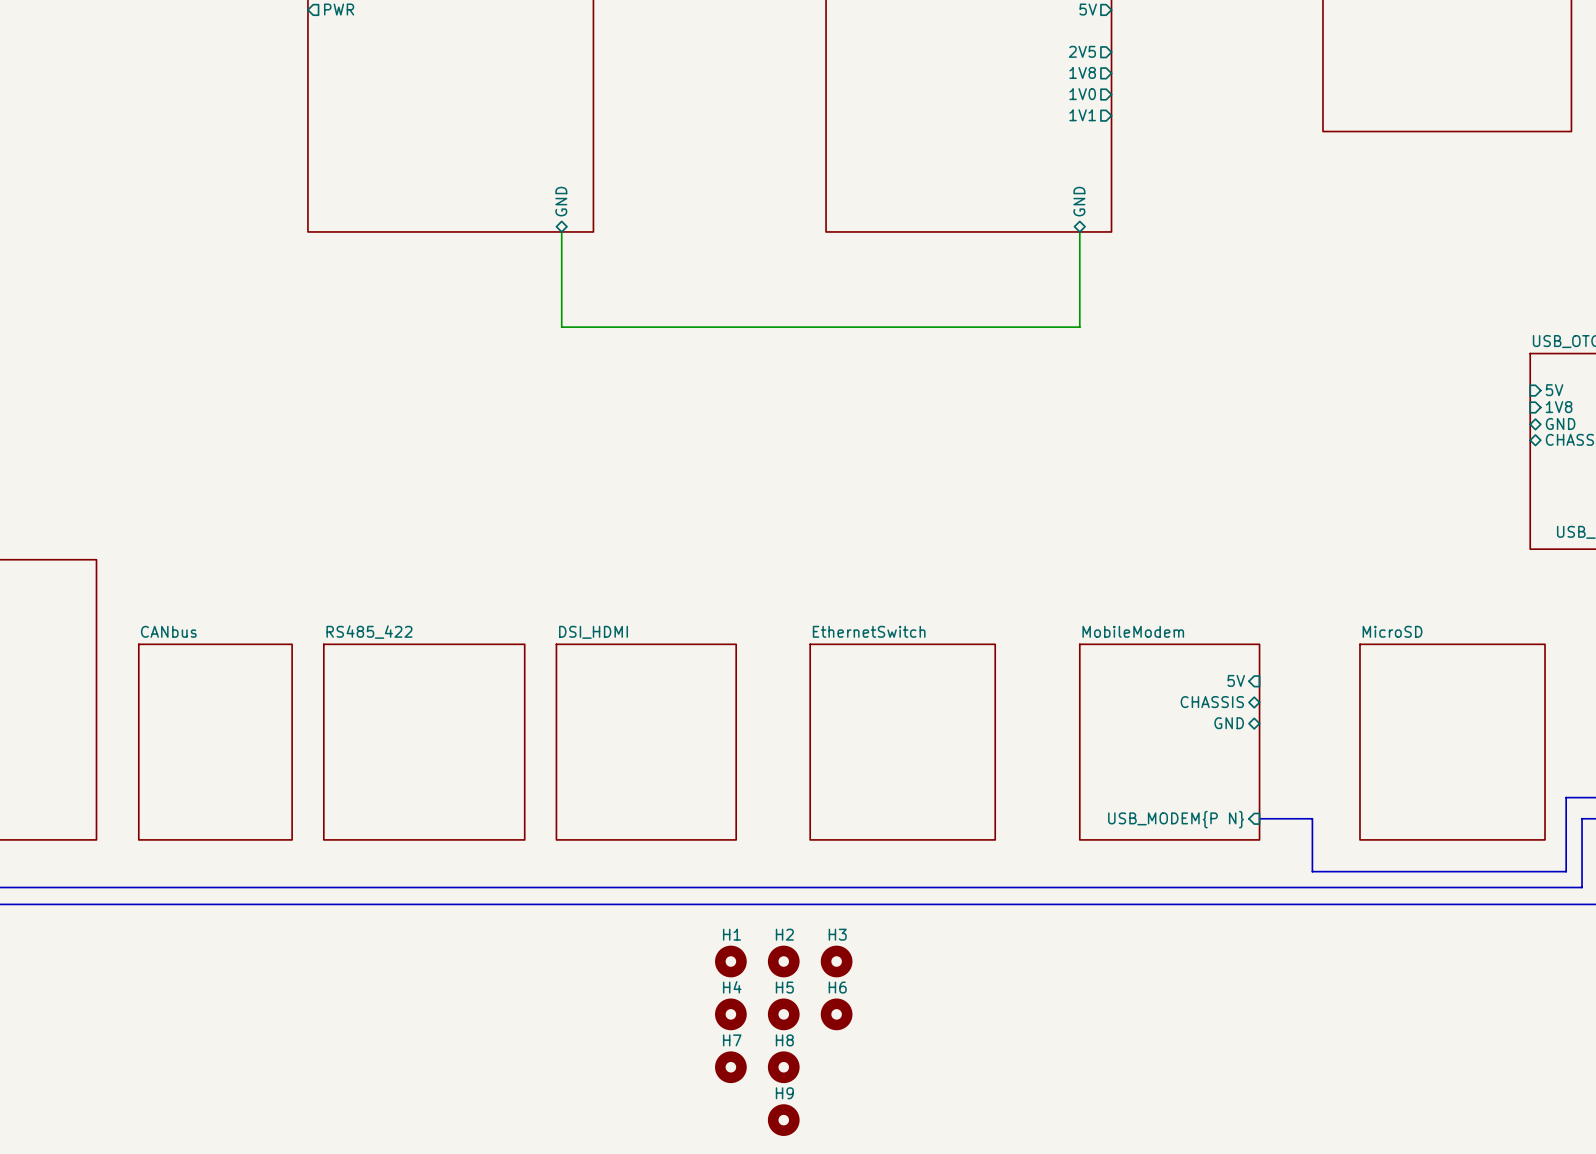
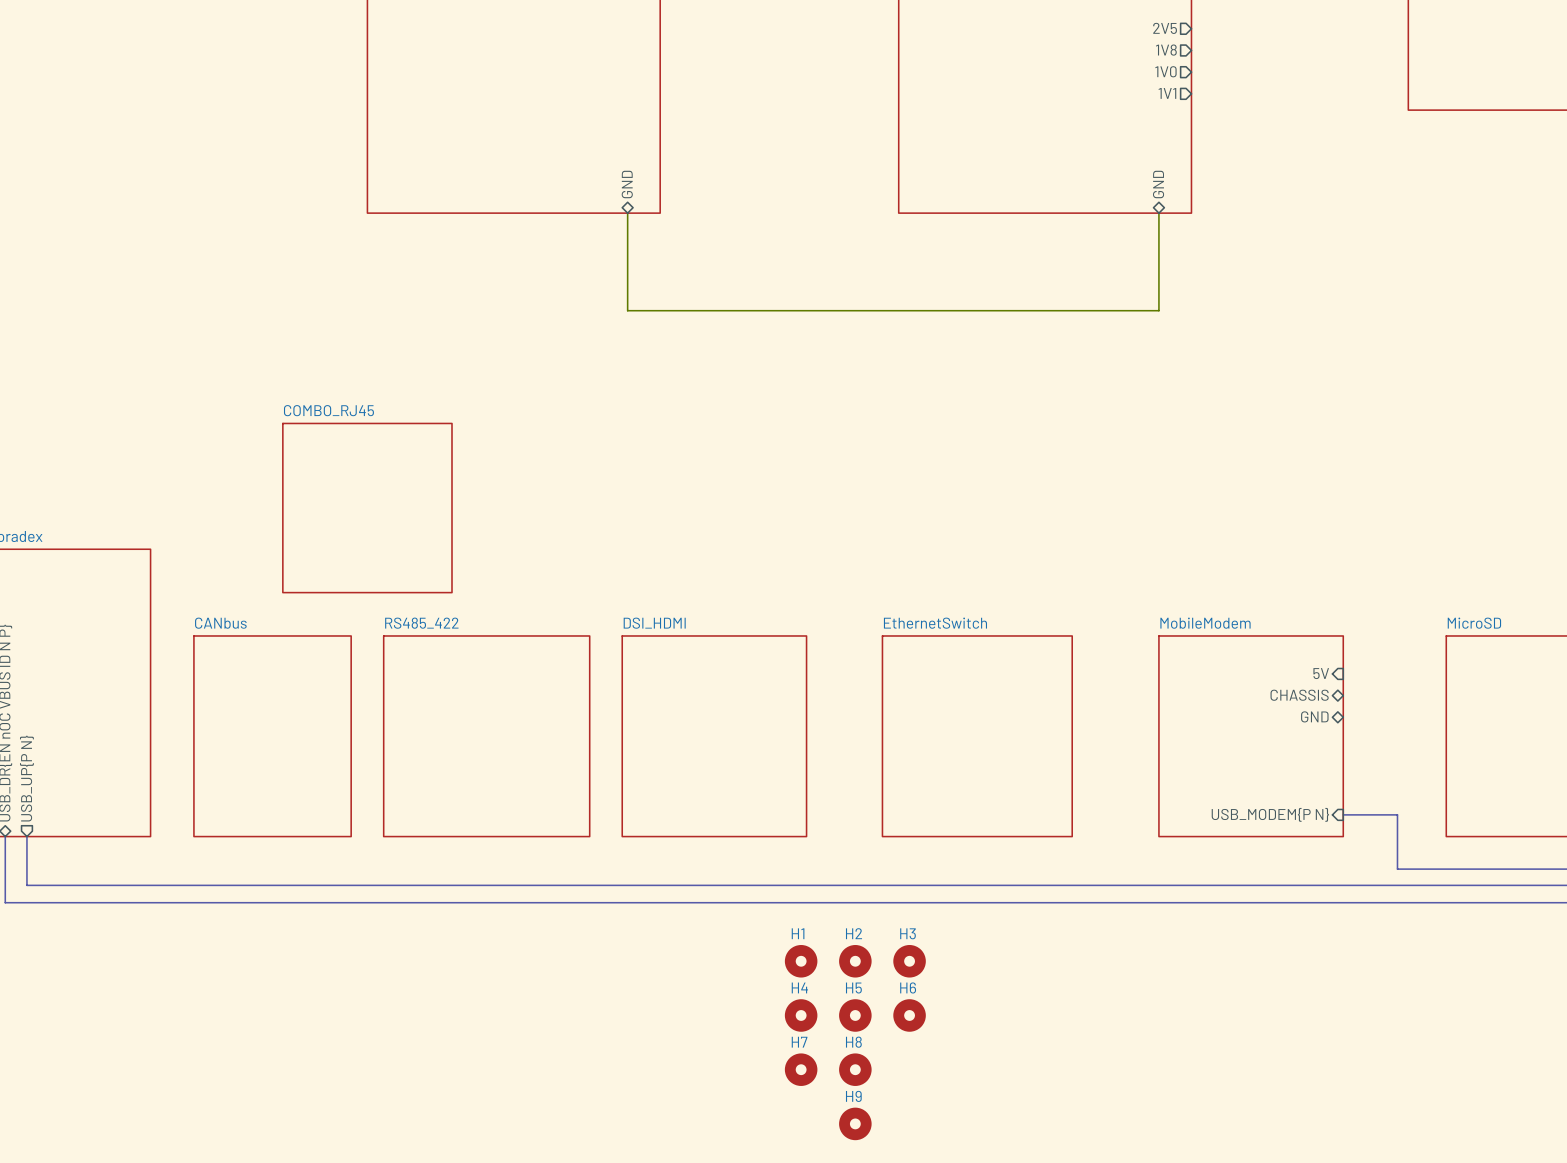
sheet COMBO_RJ45: none -> (367, 508)

